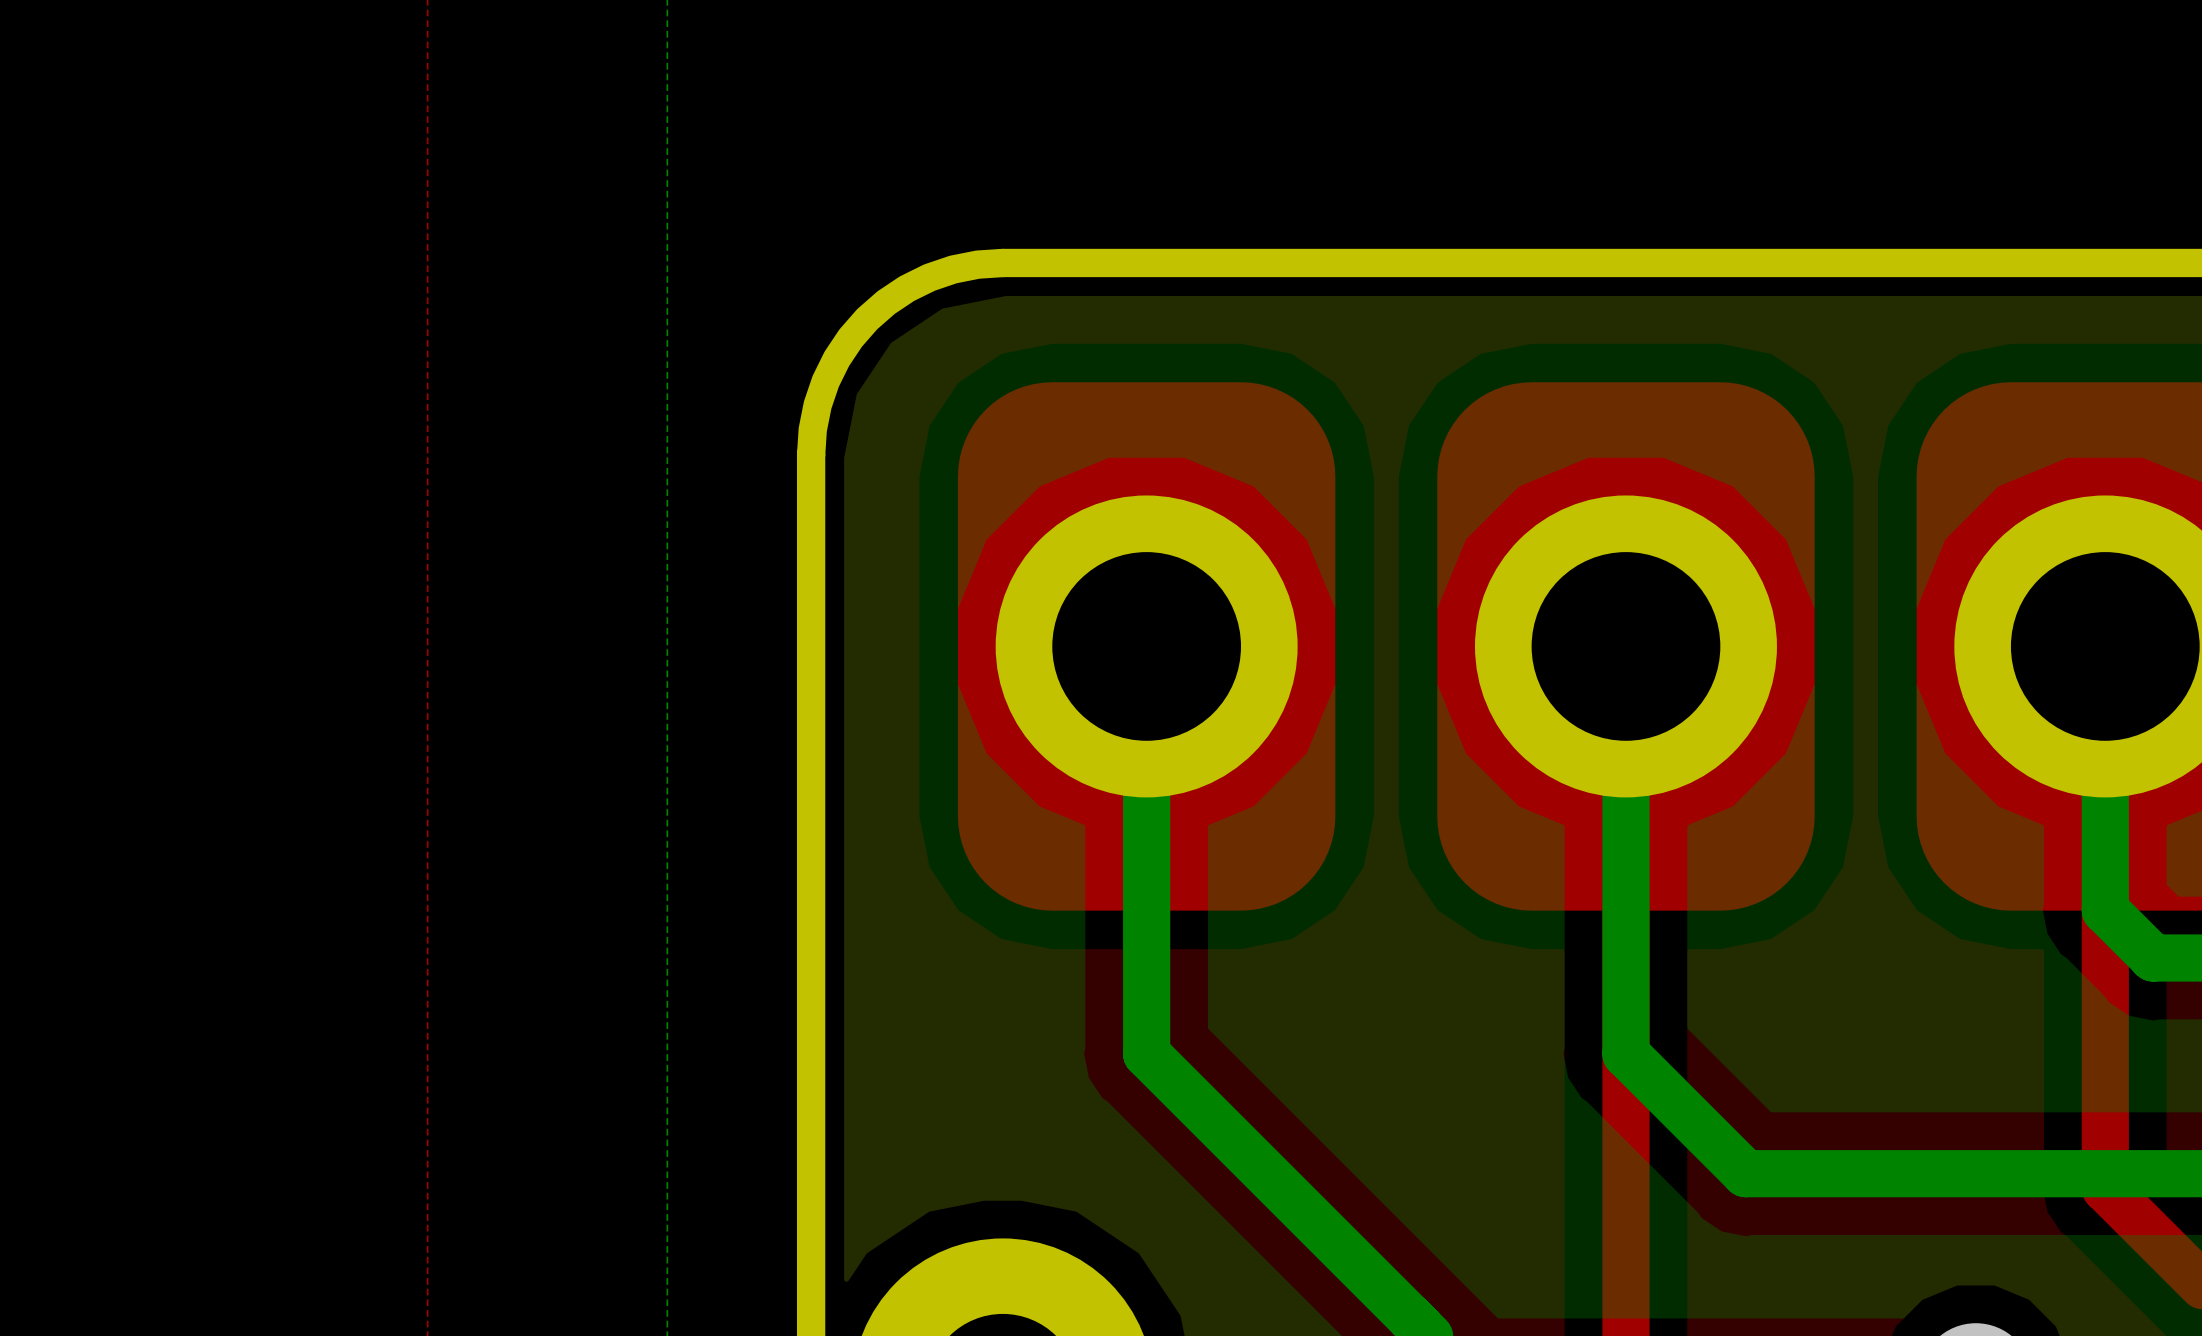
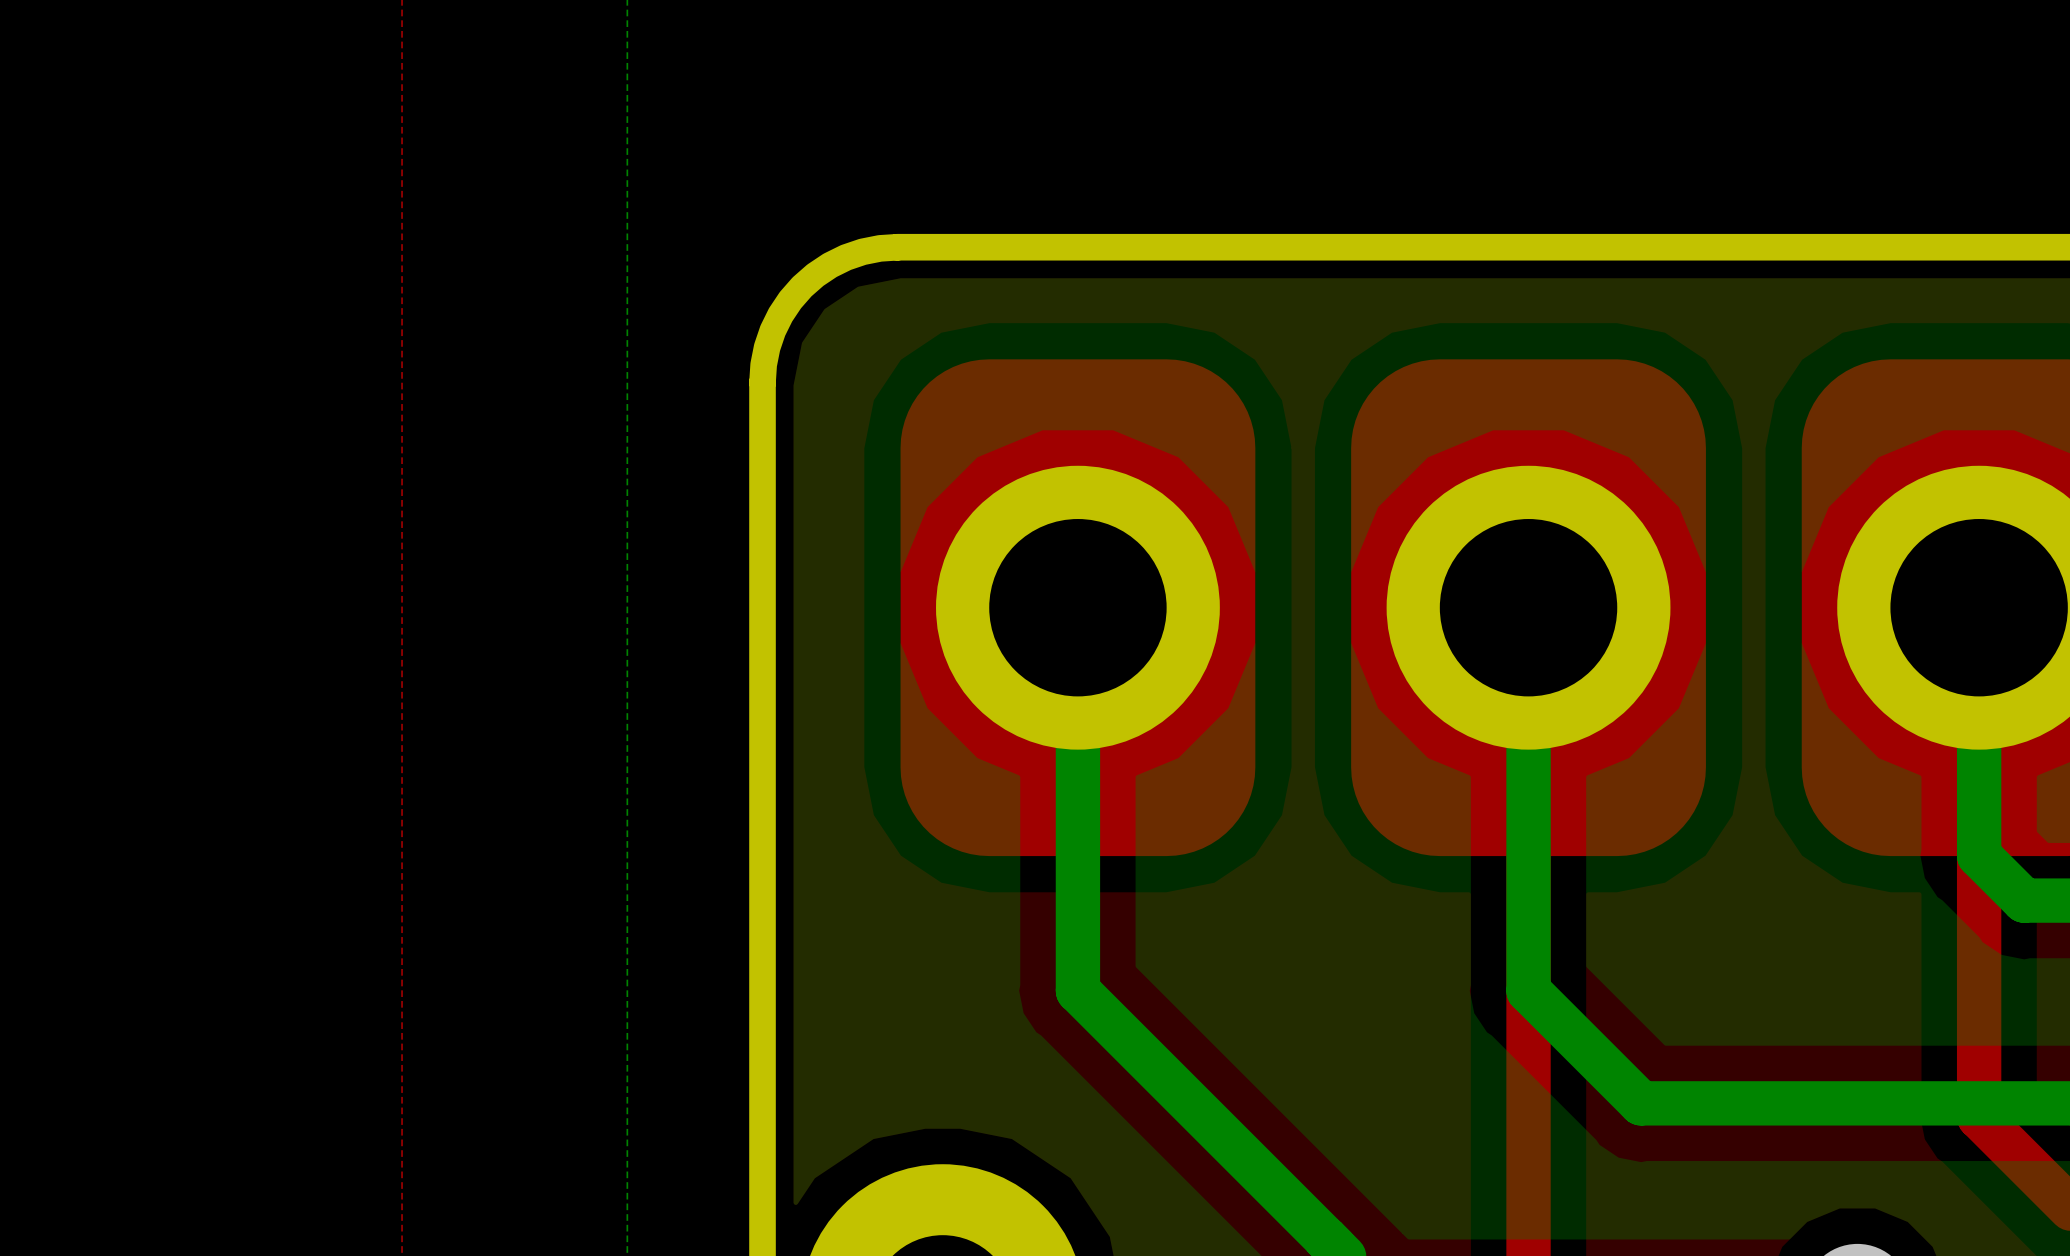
board edge: (1002, 262) (977, 264) (953, 269) (929, 277) (906, 288) (886, 302) (867, 319) (850, 337) (836, 358) (825, 381) (817, 405) (812, 429) (811, 454) -> (942, 247) (897, 247) (862, 251) (830, 265) (802, 286) (780, 314) (767, 347) (762, 382) (762, 427)

